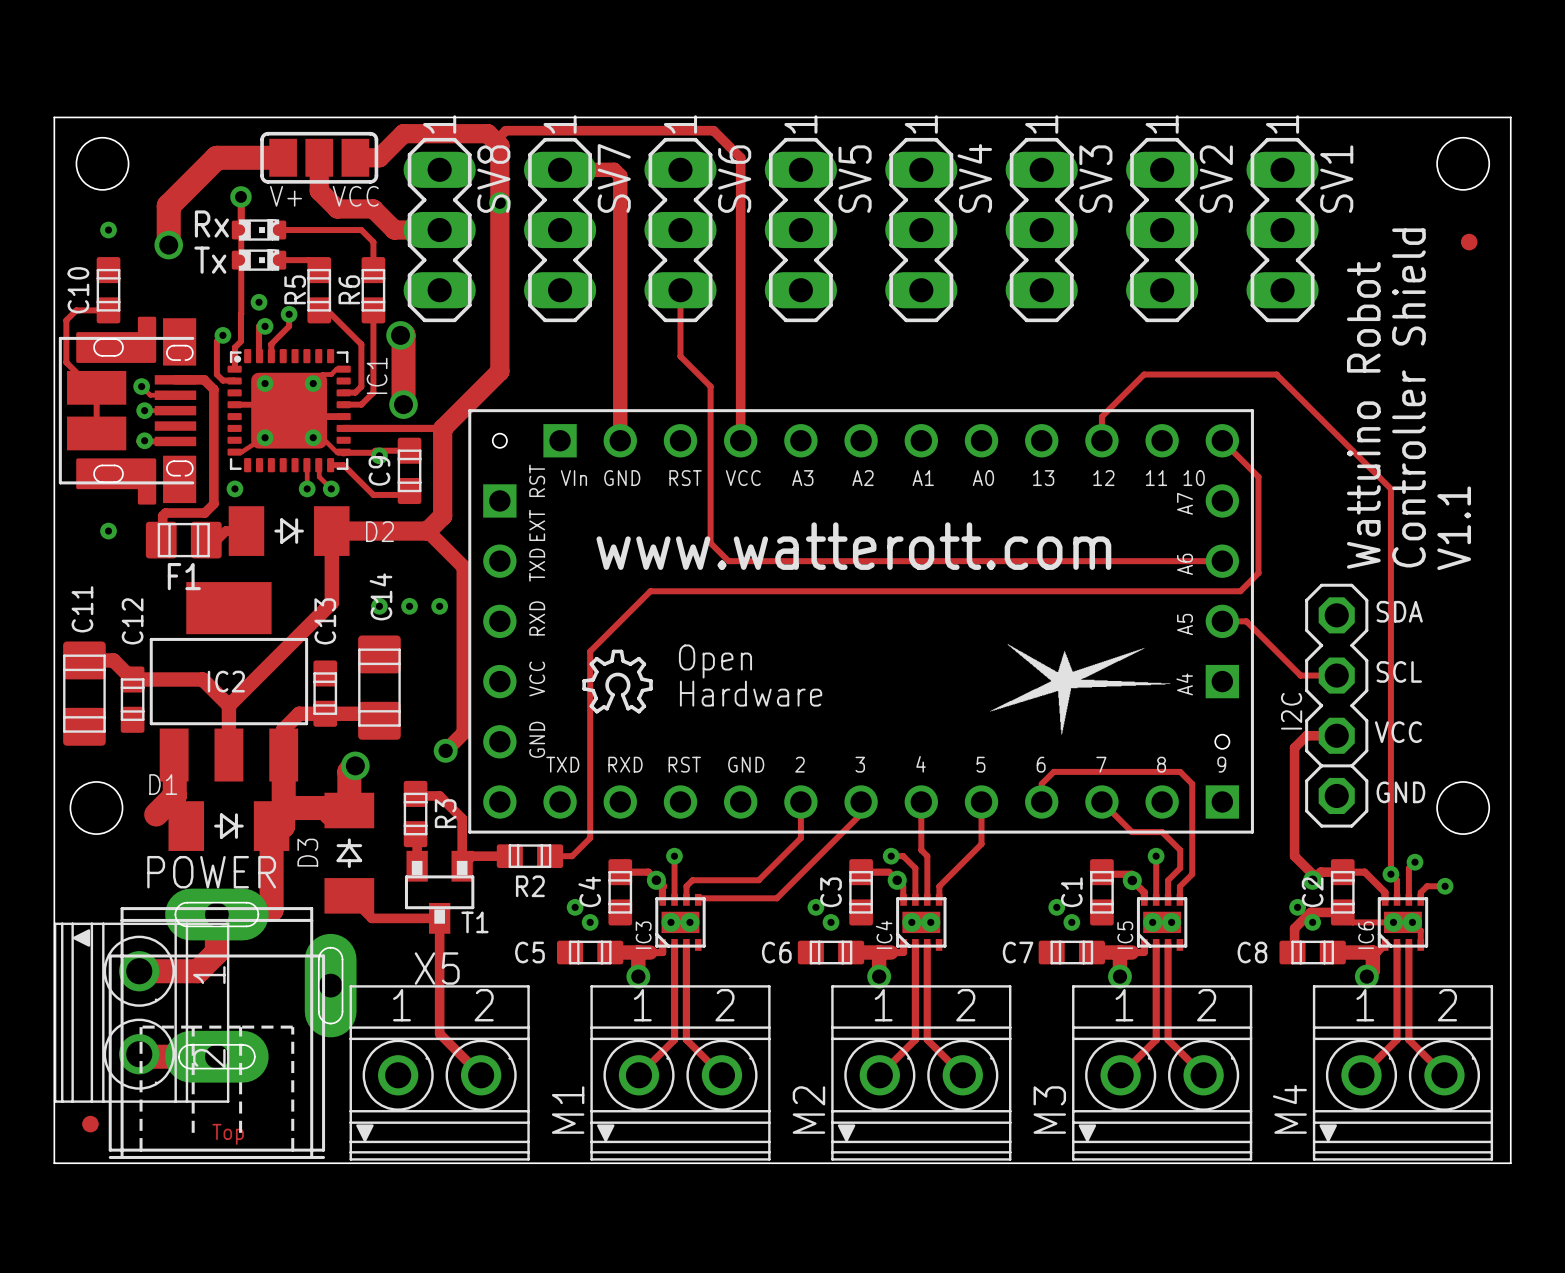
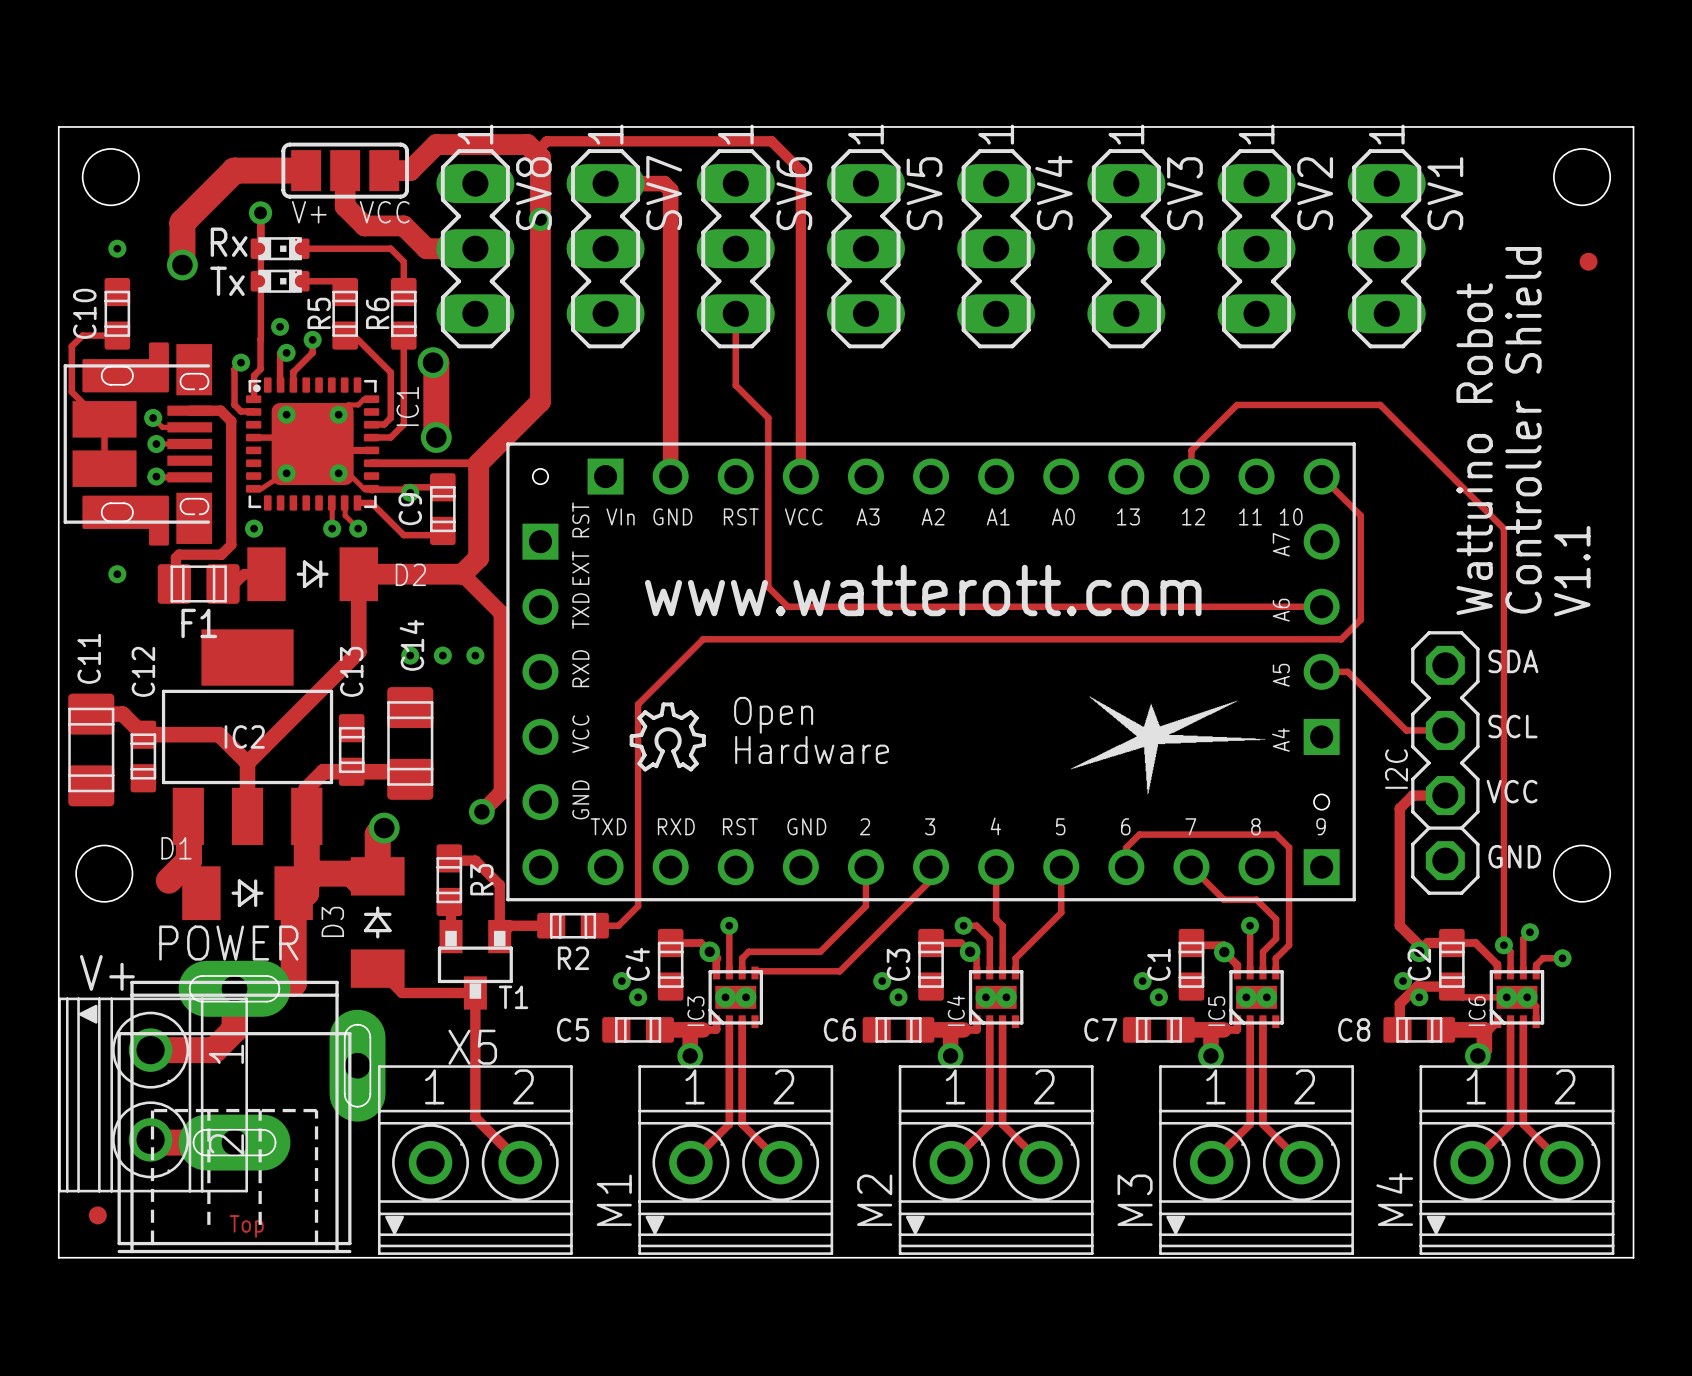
text: none -> V+ (107, 972)

